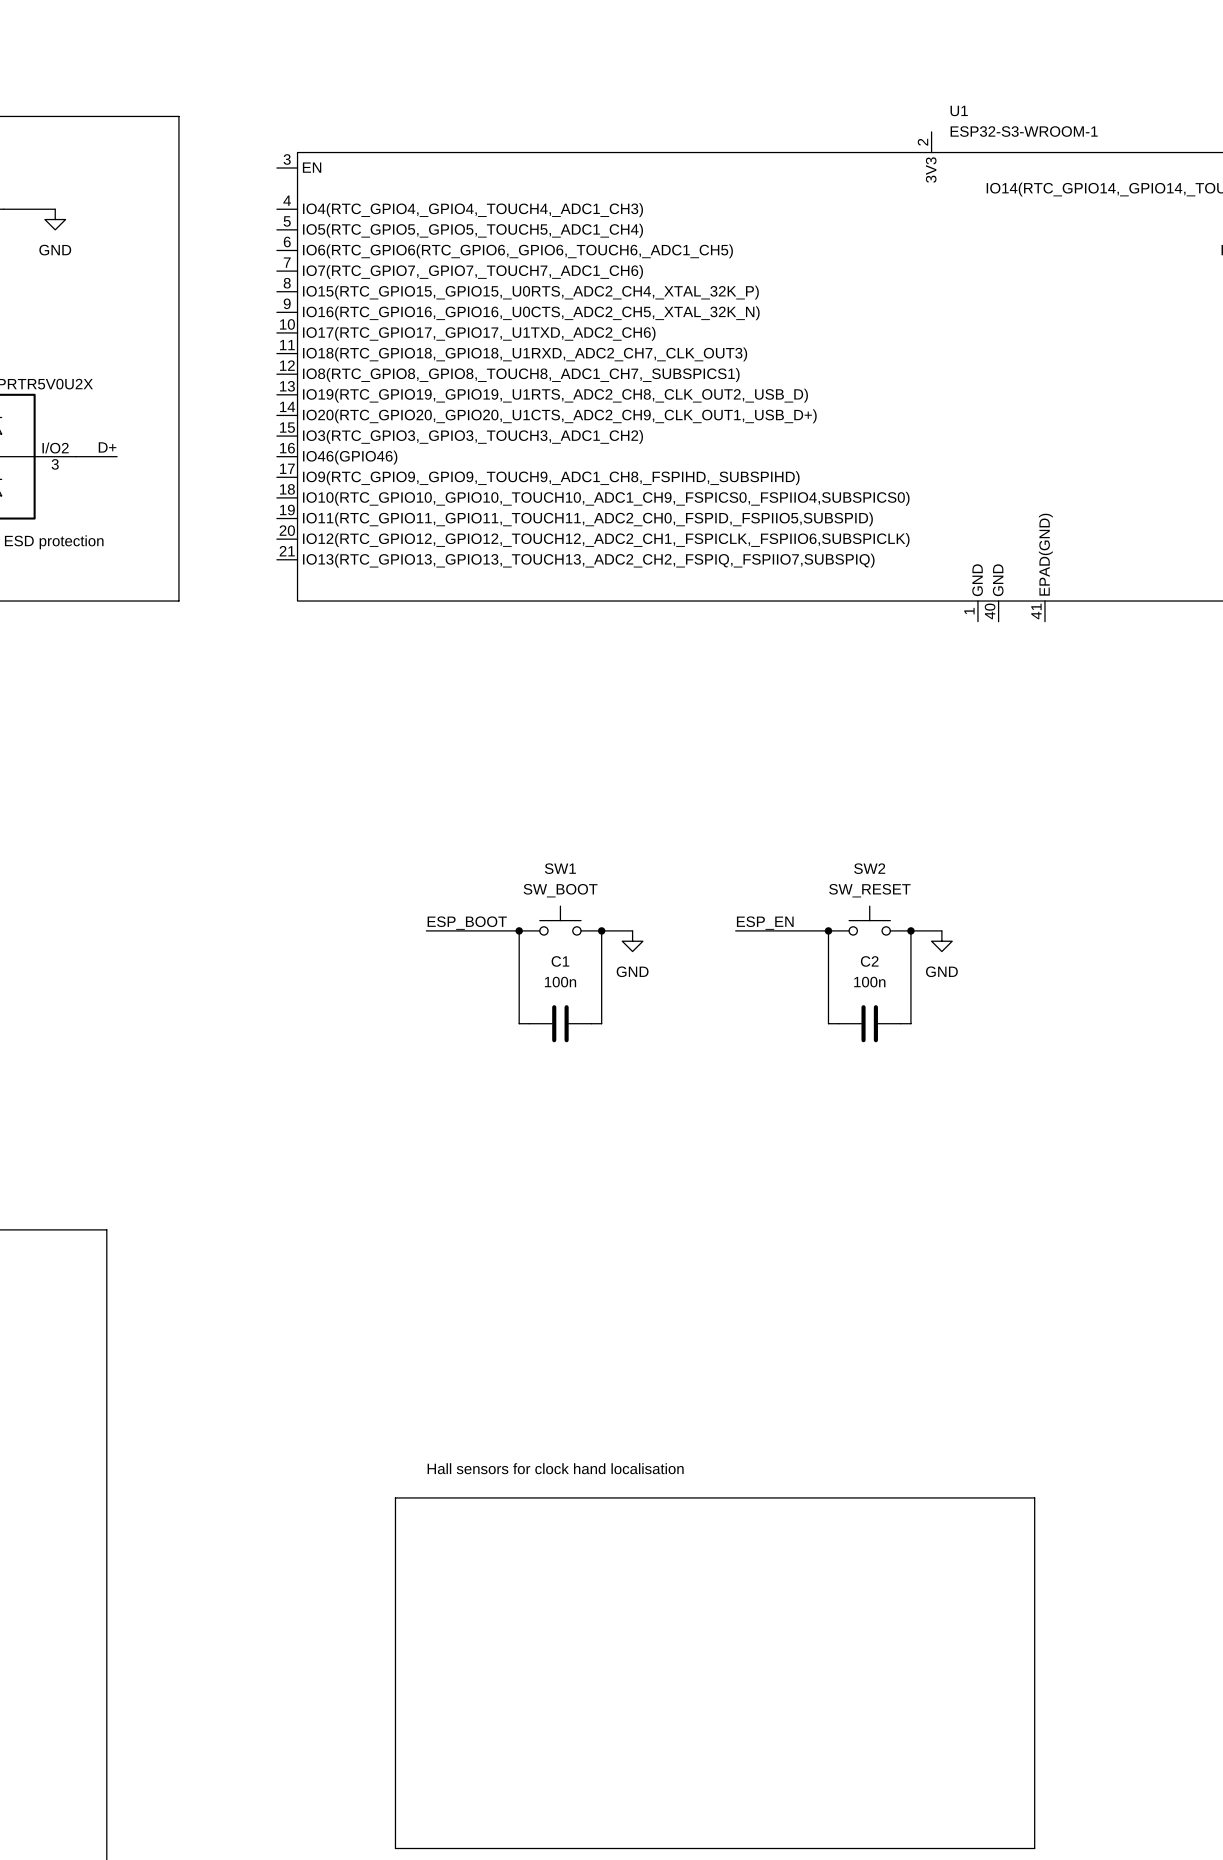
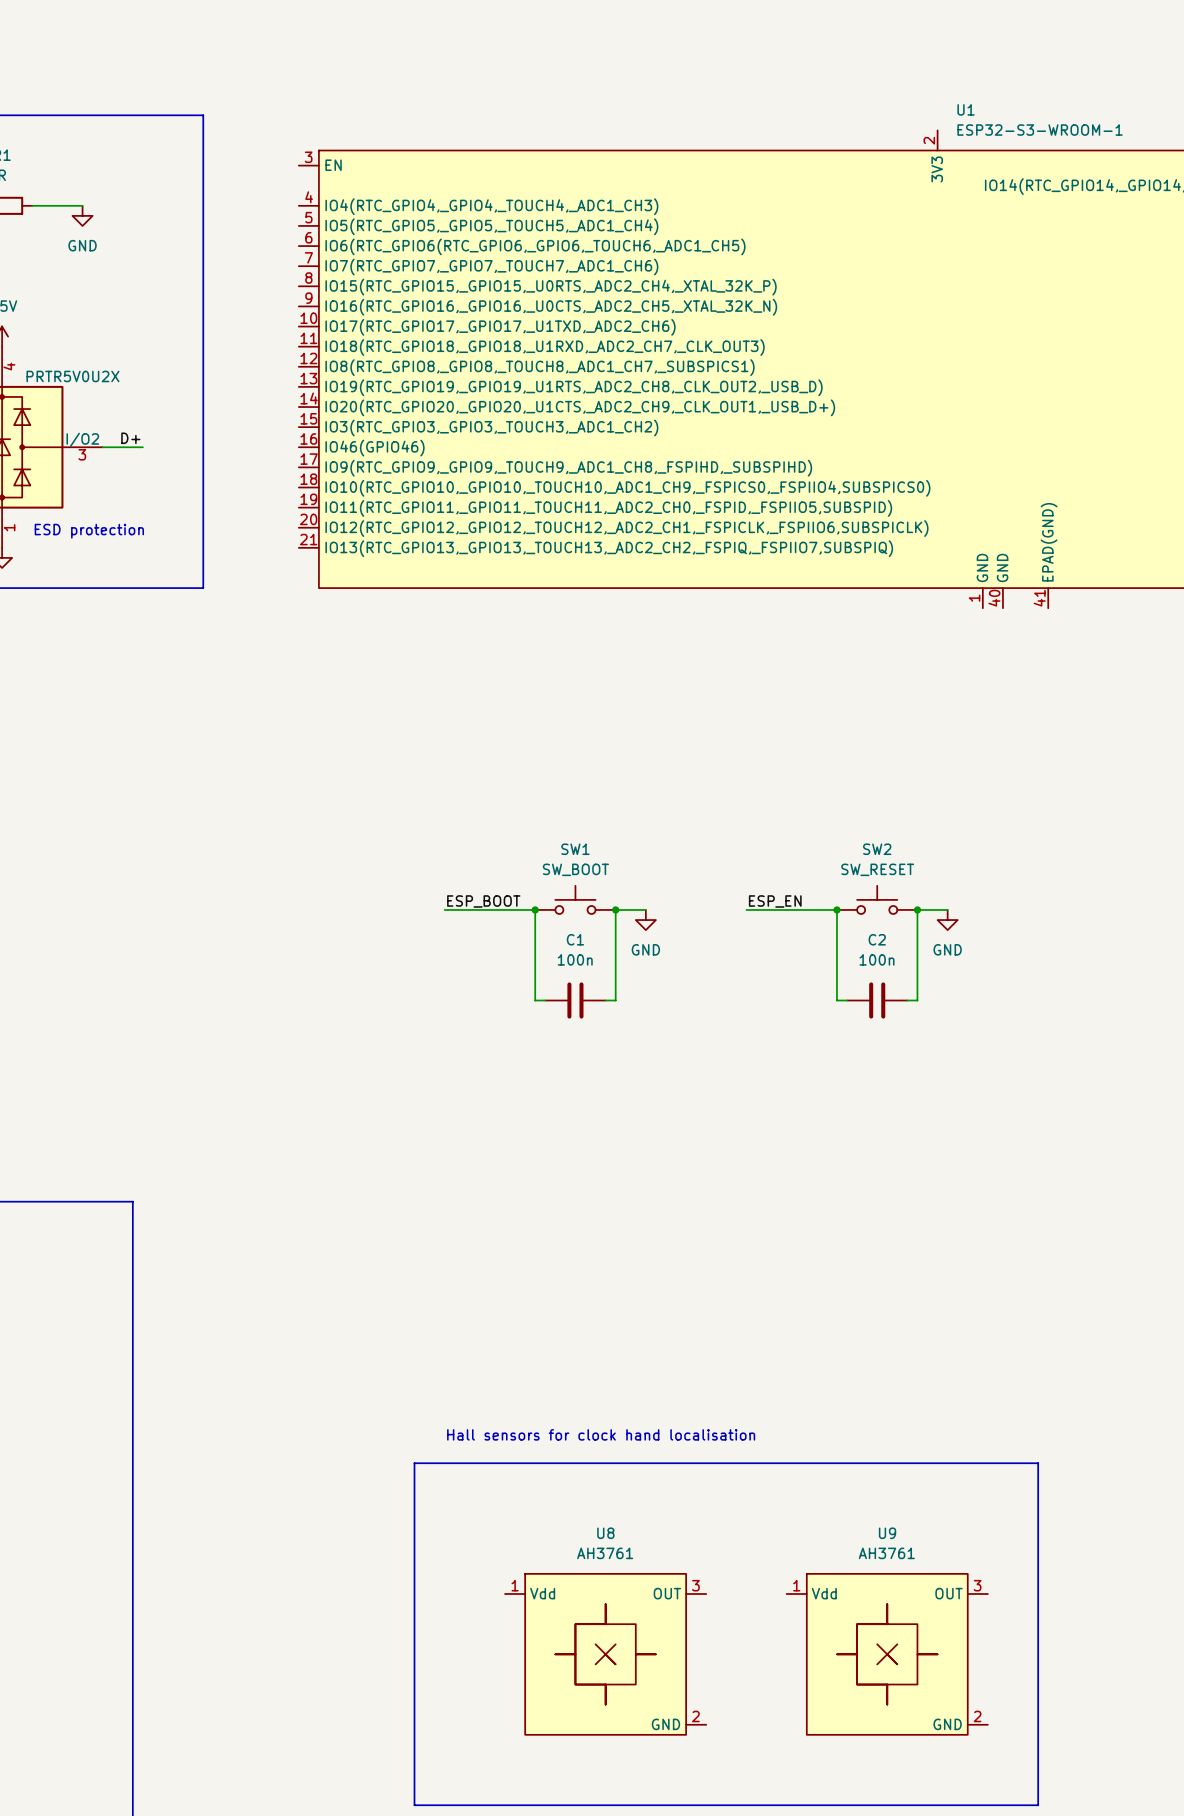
U8: none -> AH3761 (605, 1654)
U9: none -> AH3761 (887, 1654)

